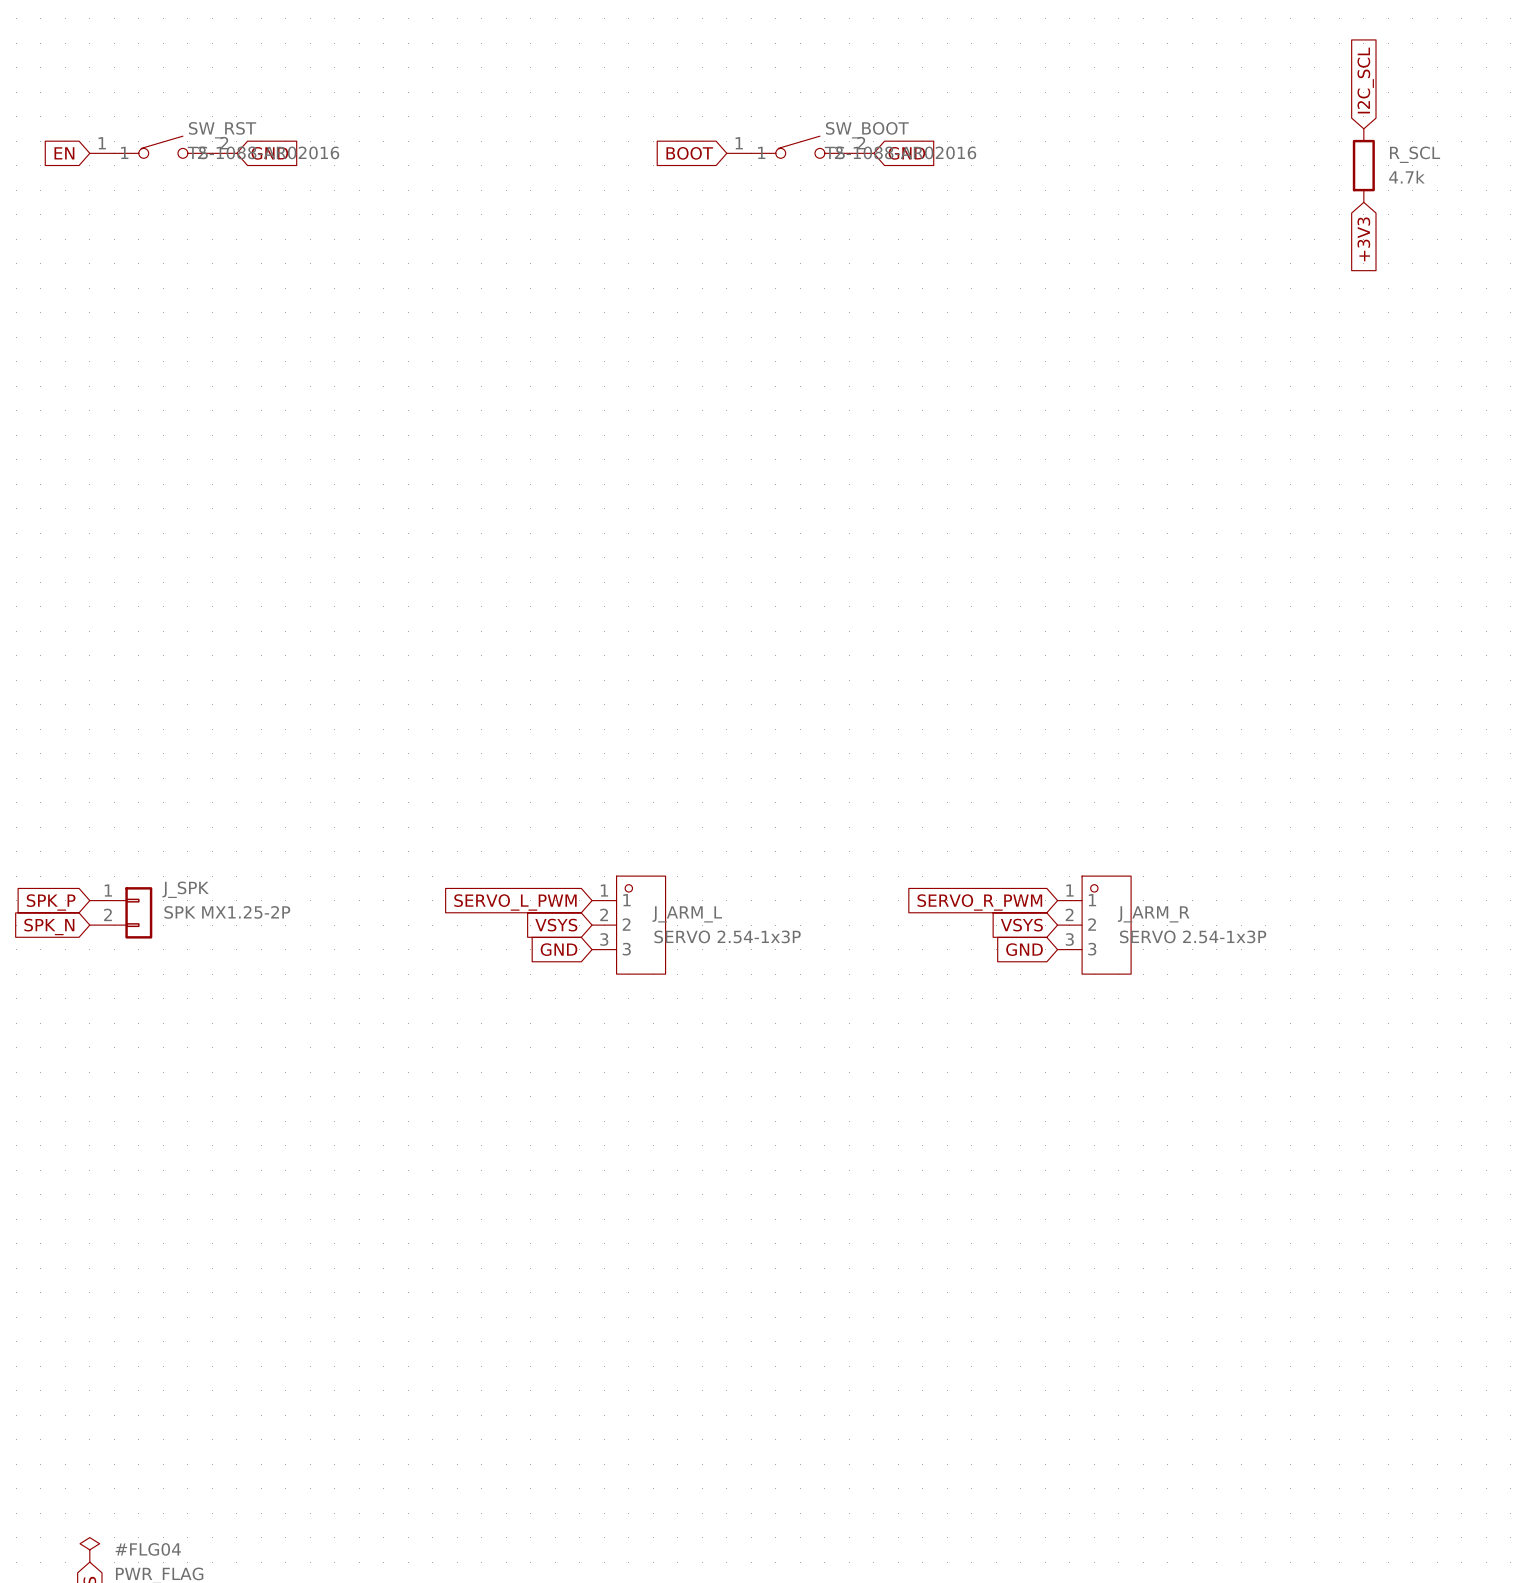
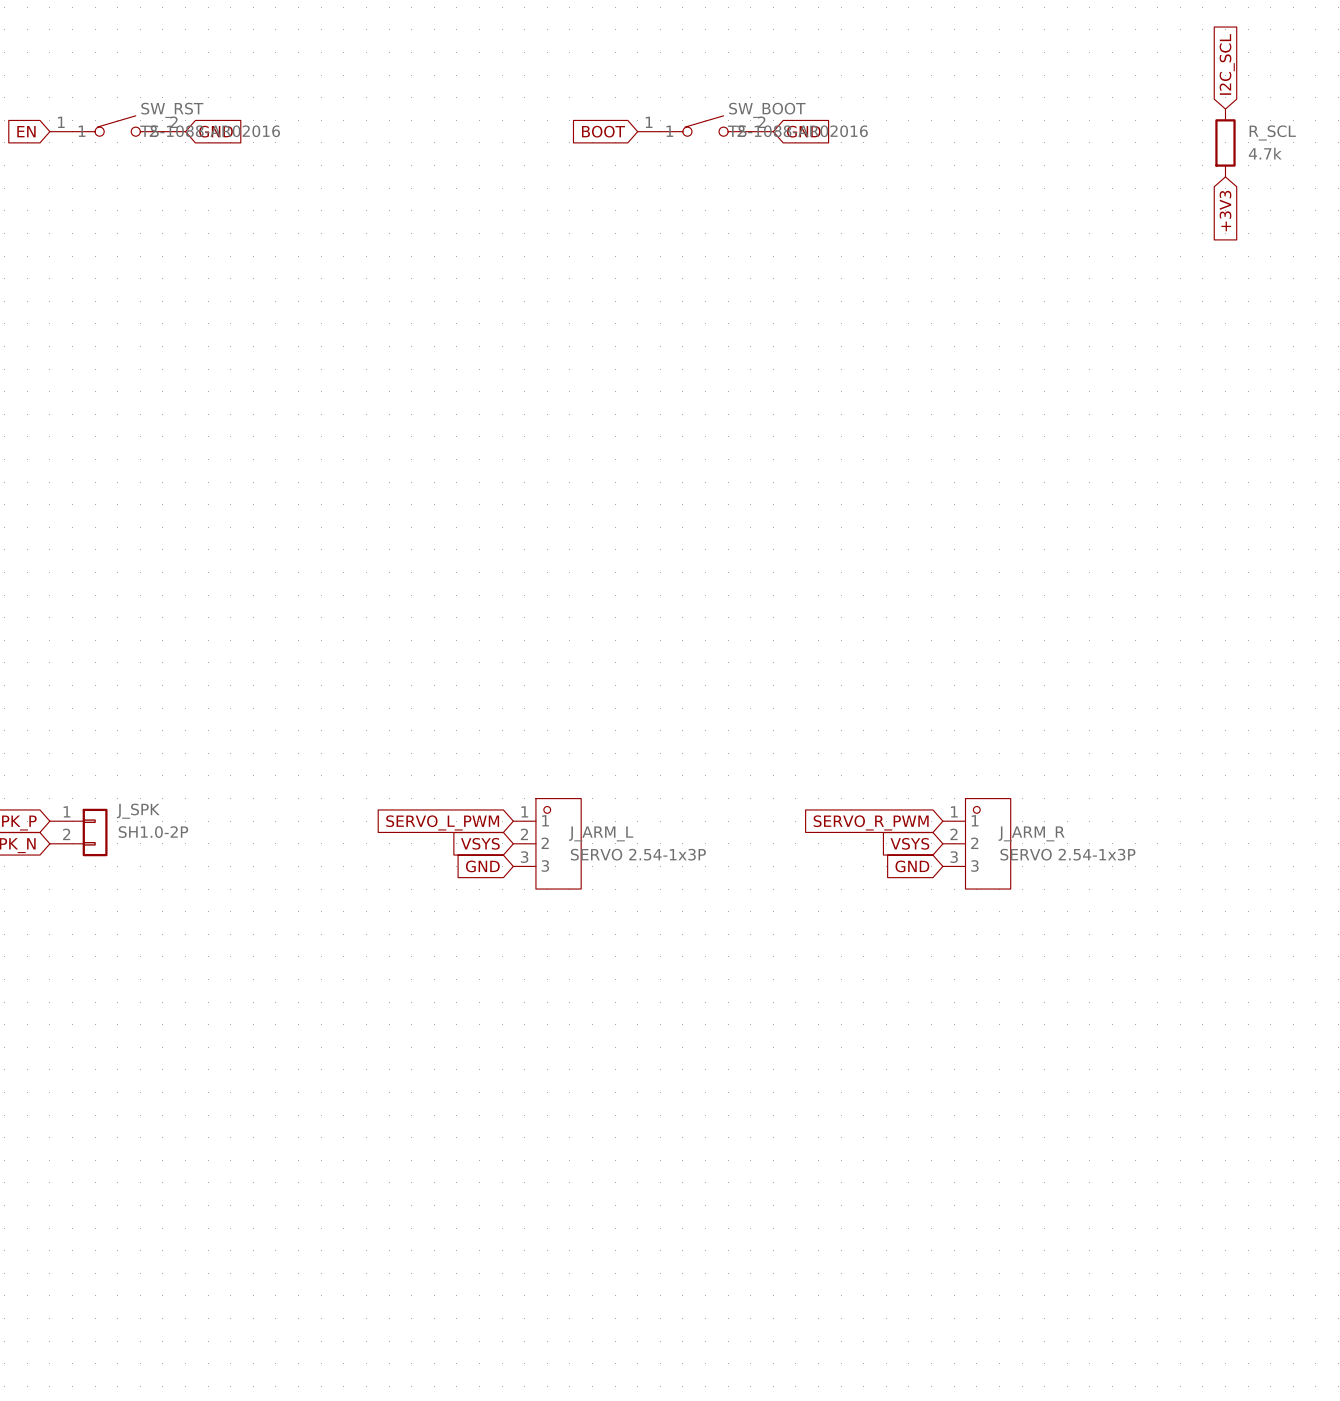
J_SPK value: SPK MX1.25-2P (227, 912) -> SH1.0-2P (153, 832)

